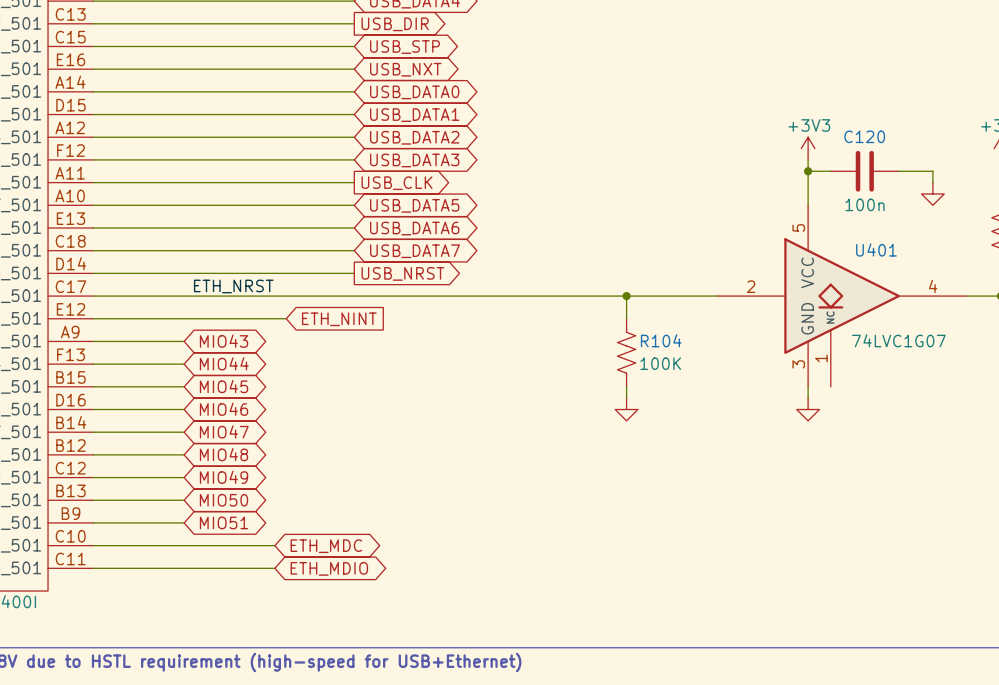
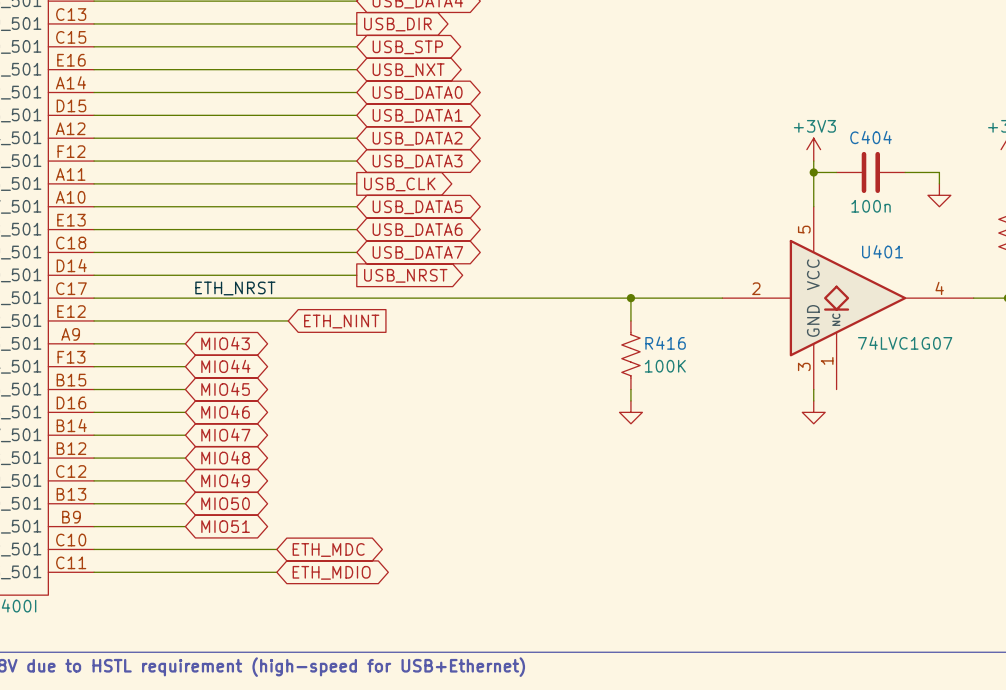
C120 name: C120 (864, 136) -> C404 (871, 137)
R104 name: R104 (661, 340) -> R416 (665, 343)

